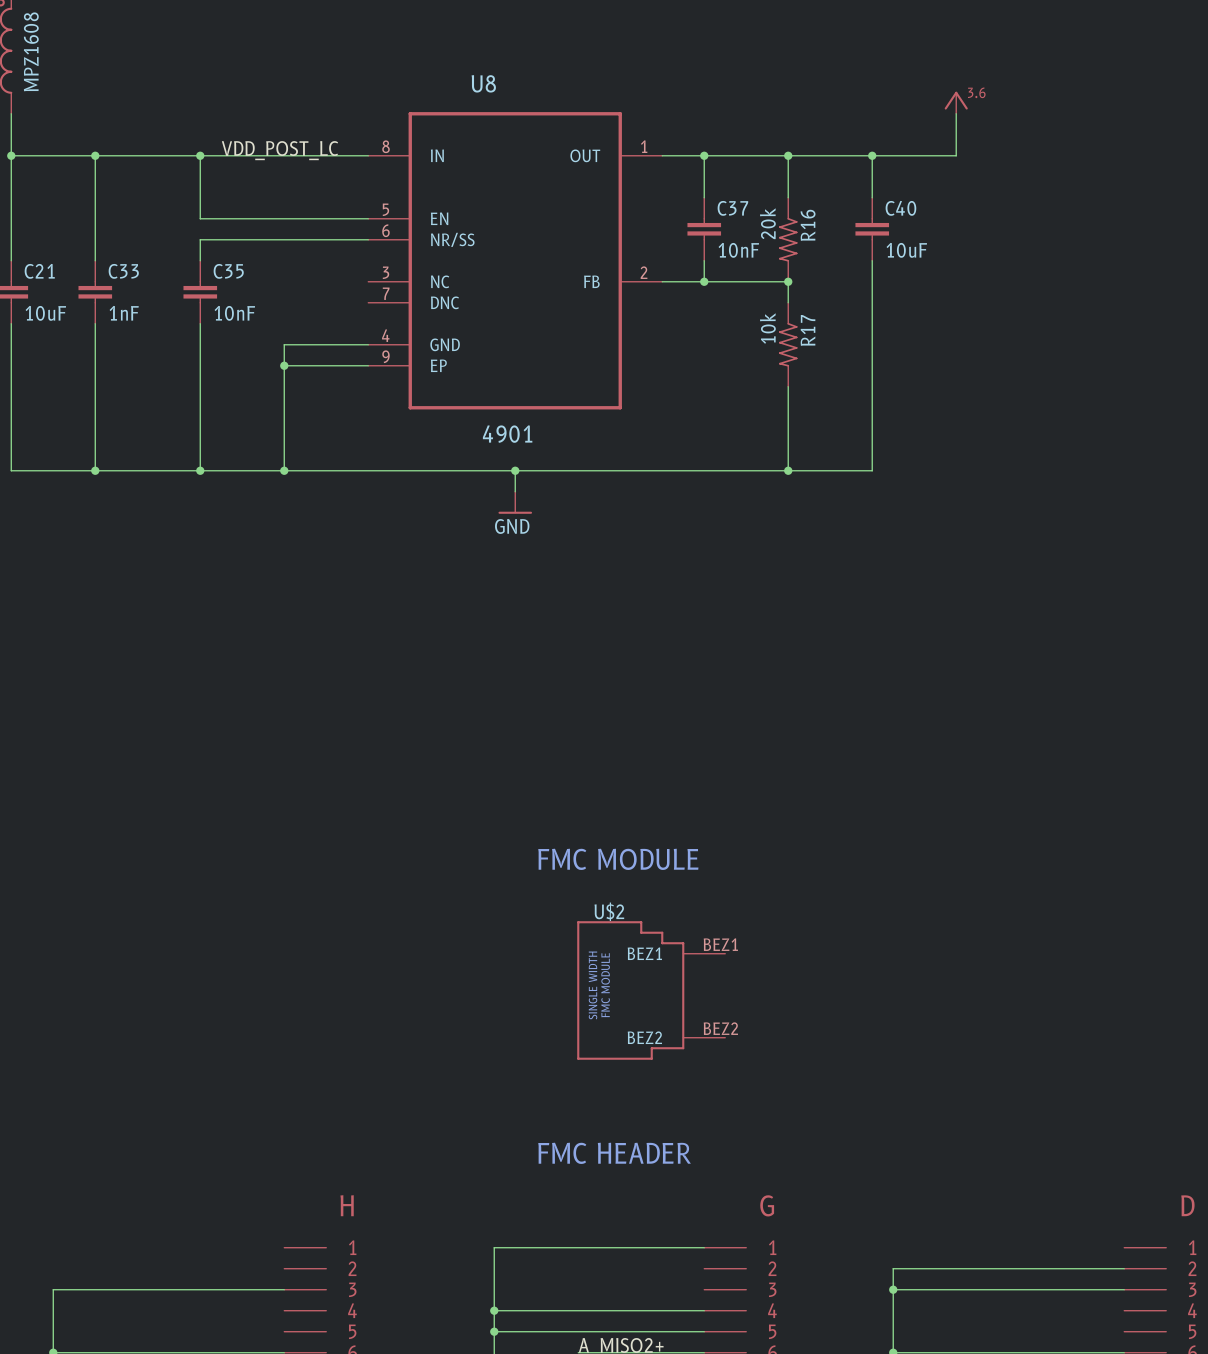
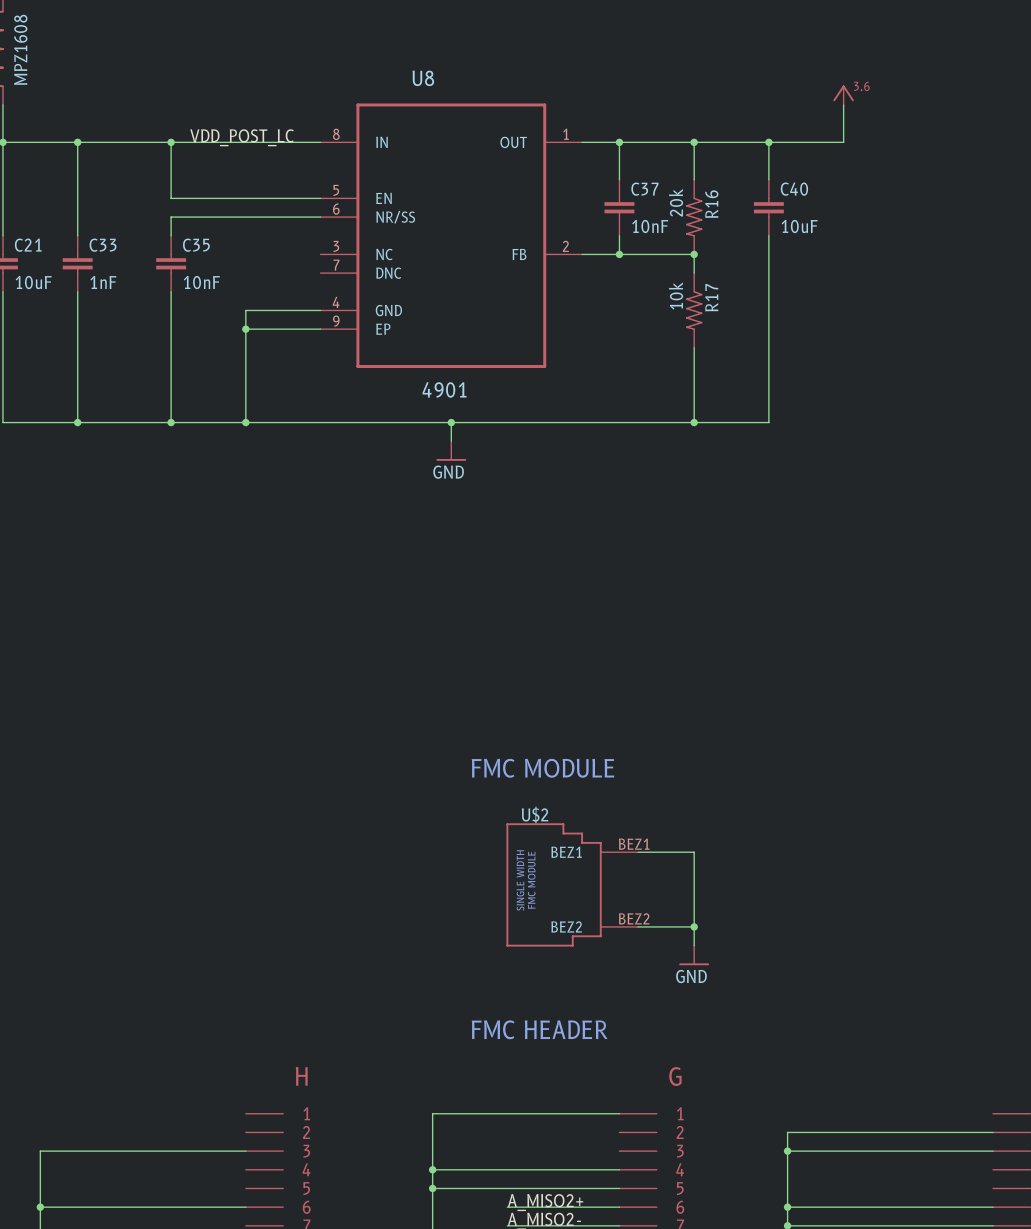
wire: none -> (638, 852) (694, 852) (694, 945)
wire: none -> (638, 926) (694, 926)
junction: none -> (694, 926)
power symbol: none -> GND (694, 955)

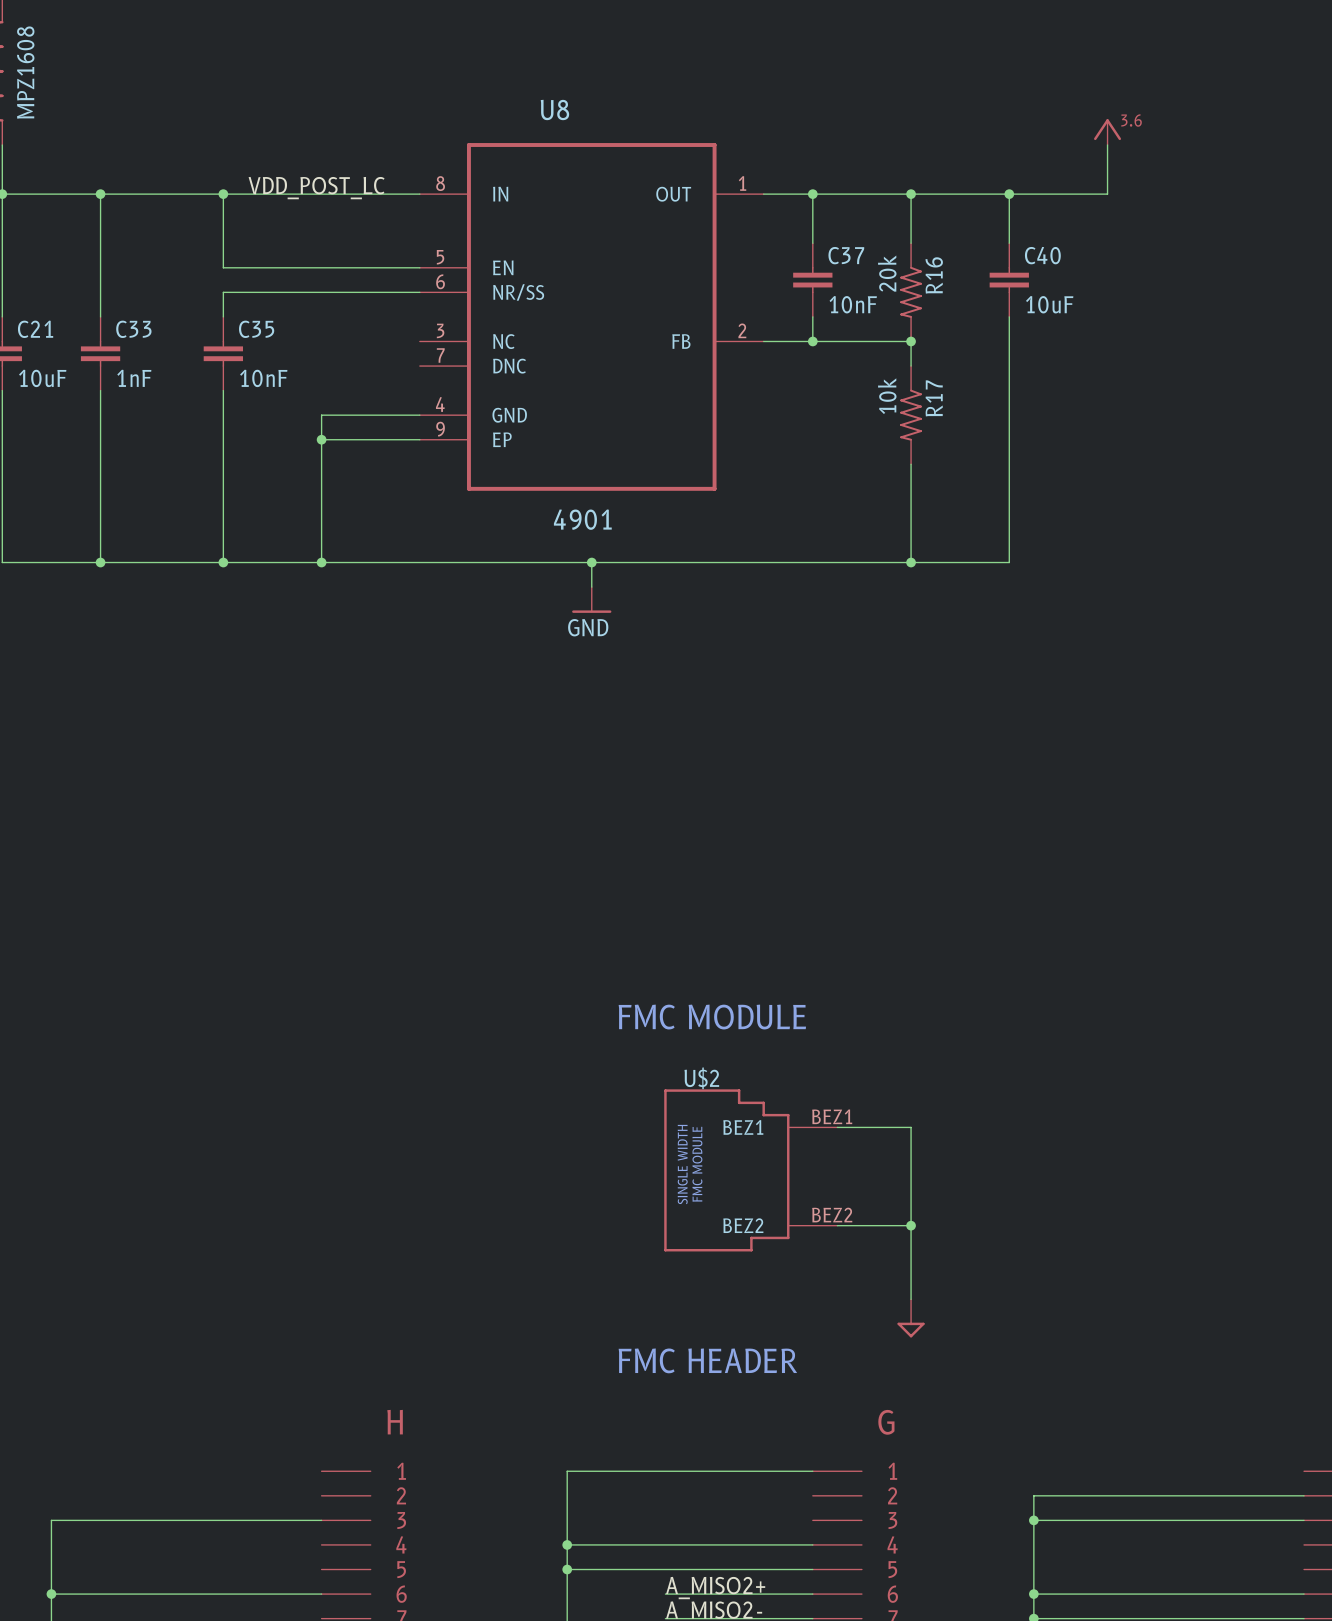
power symbol: GND (694, 955) -> none
power symbol: none -> (911, 1318)

